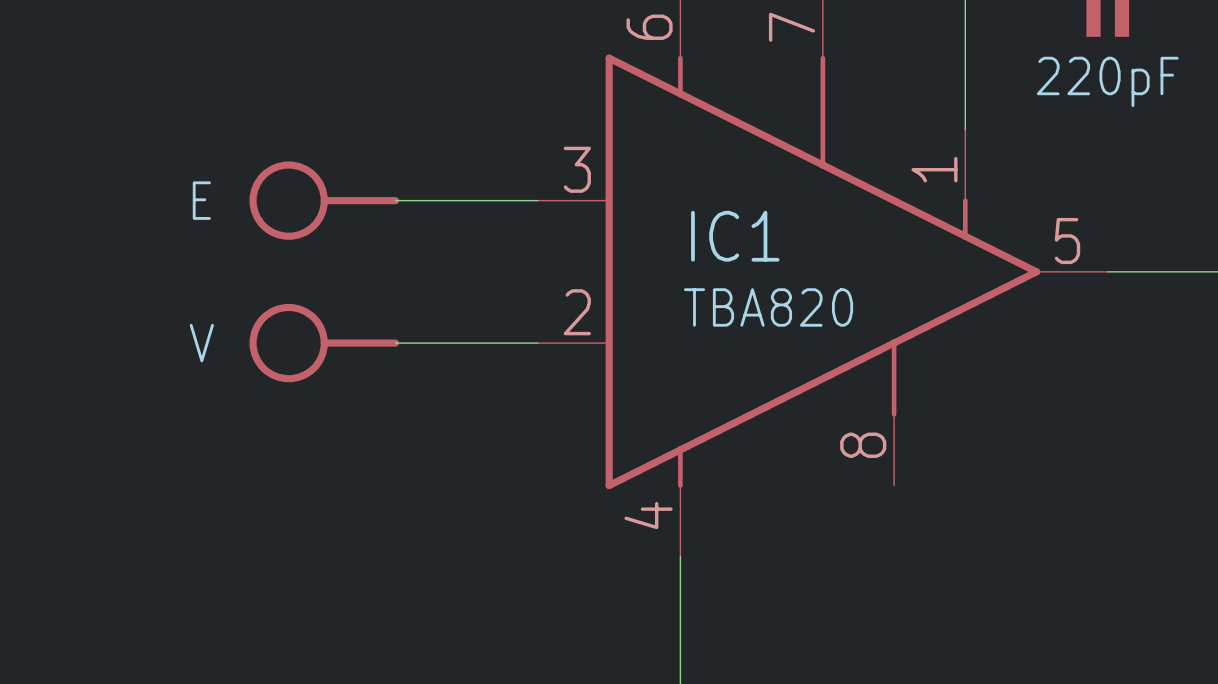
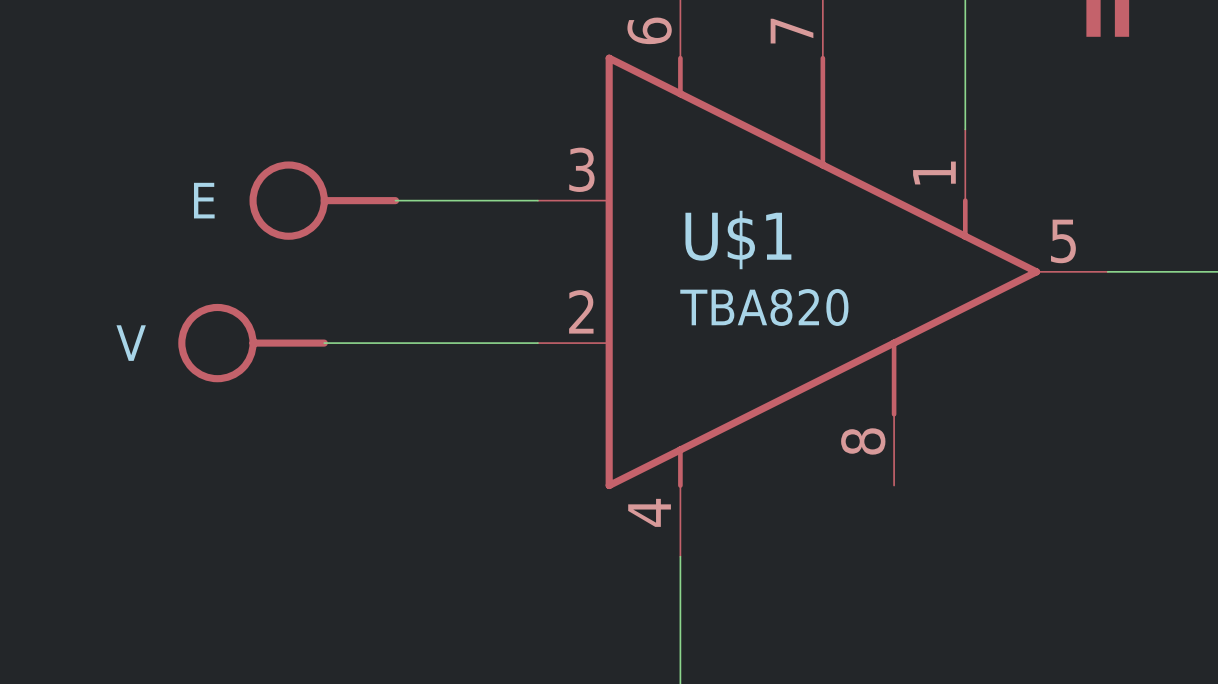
part value: 220pF (1107, 81) -> none
IC1 name: IC1 (735, 236) -> U$1 (738, 239)
V position: (324, 343) -> (253, 343)

